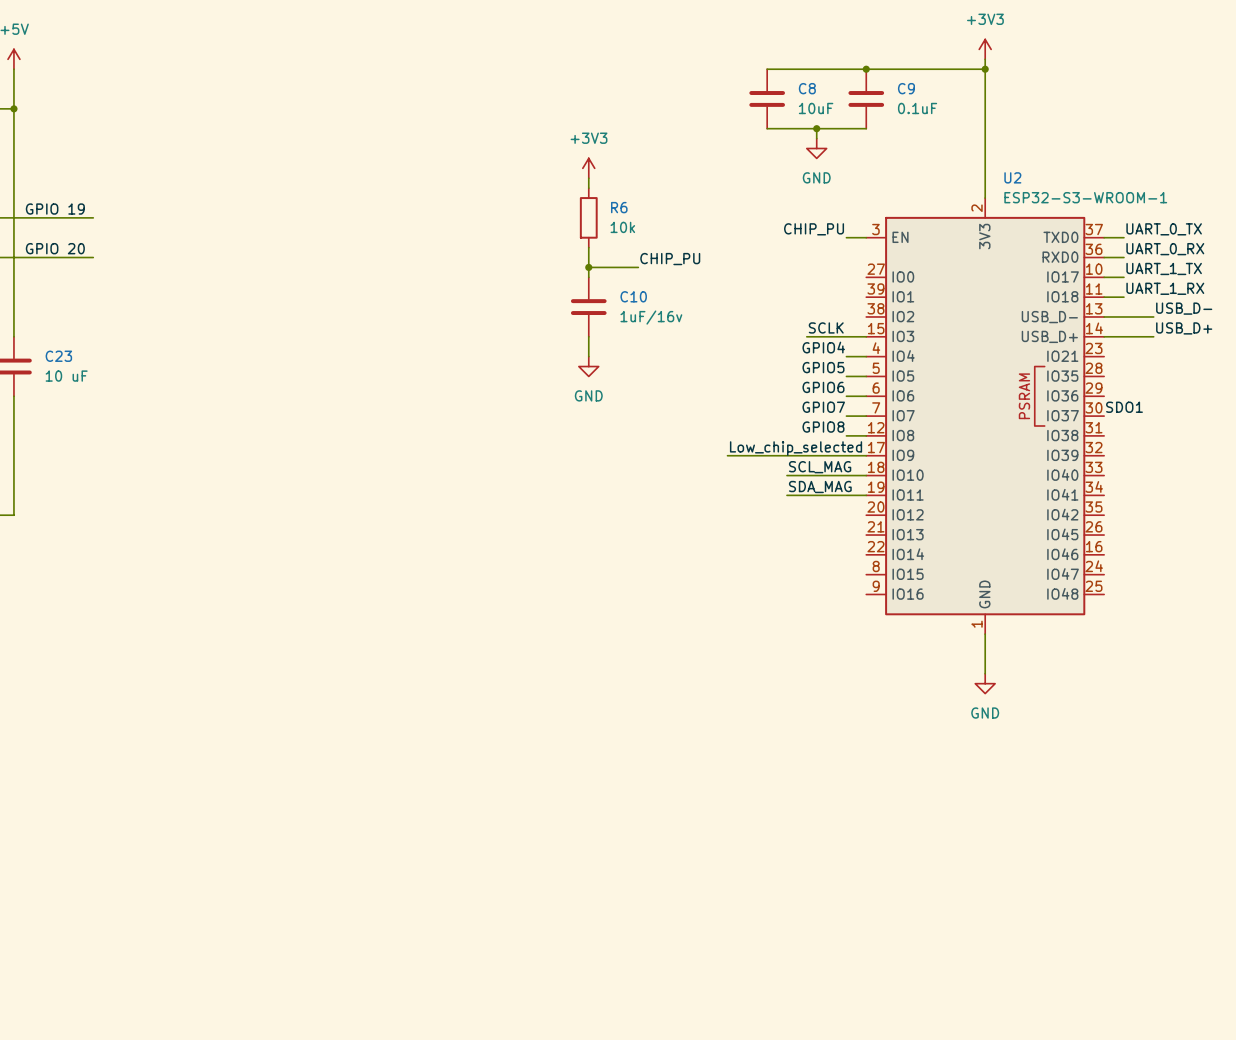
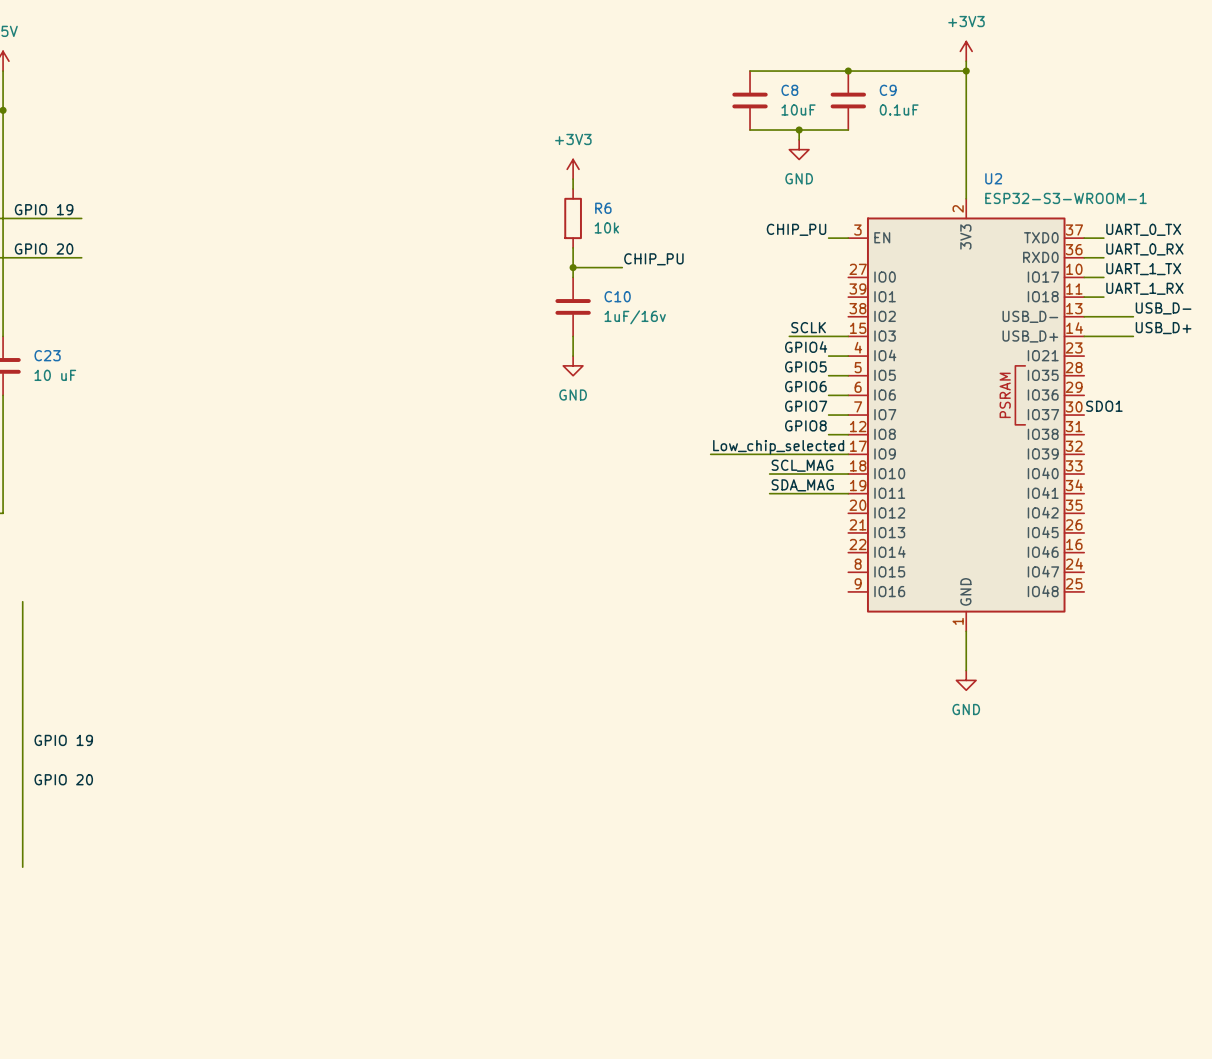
wire: none -> (22, 601) (22, 867)
label: none -> GPIO 19 (63, 740)
label: none -> GPIO 20 (63, 779)

